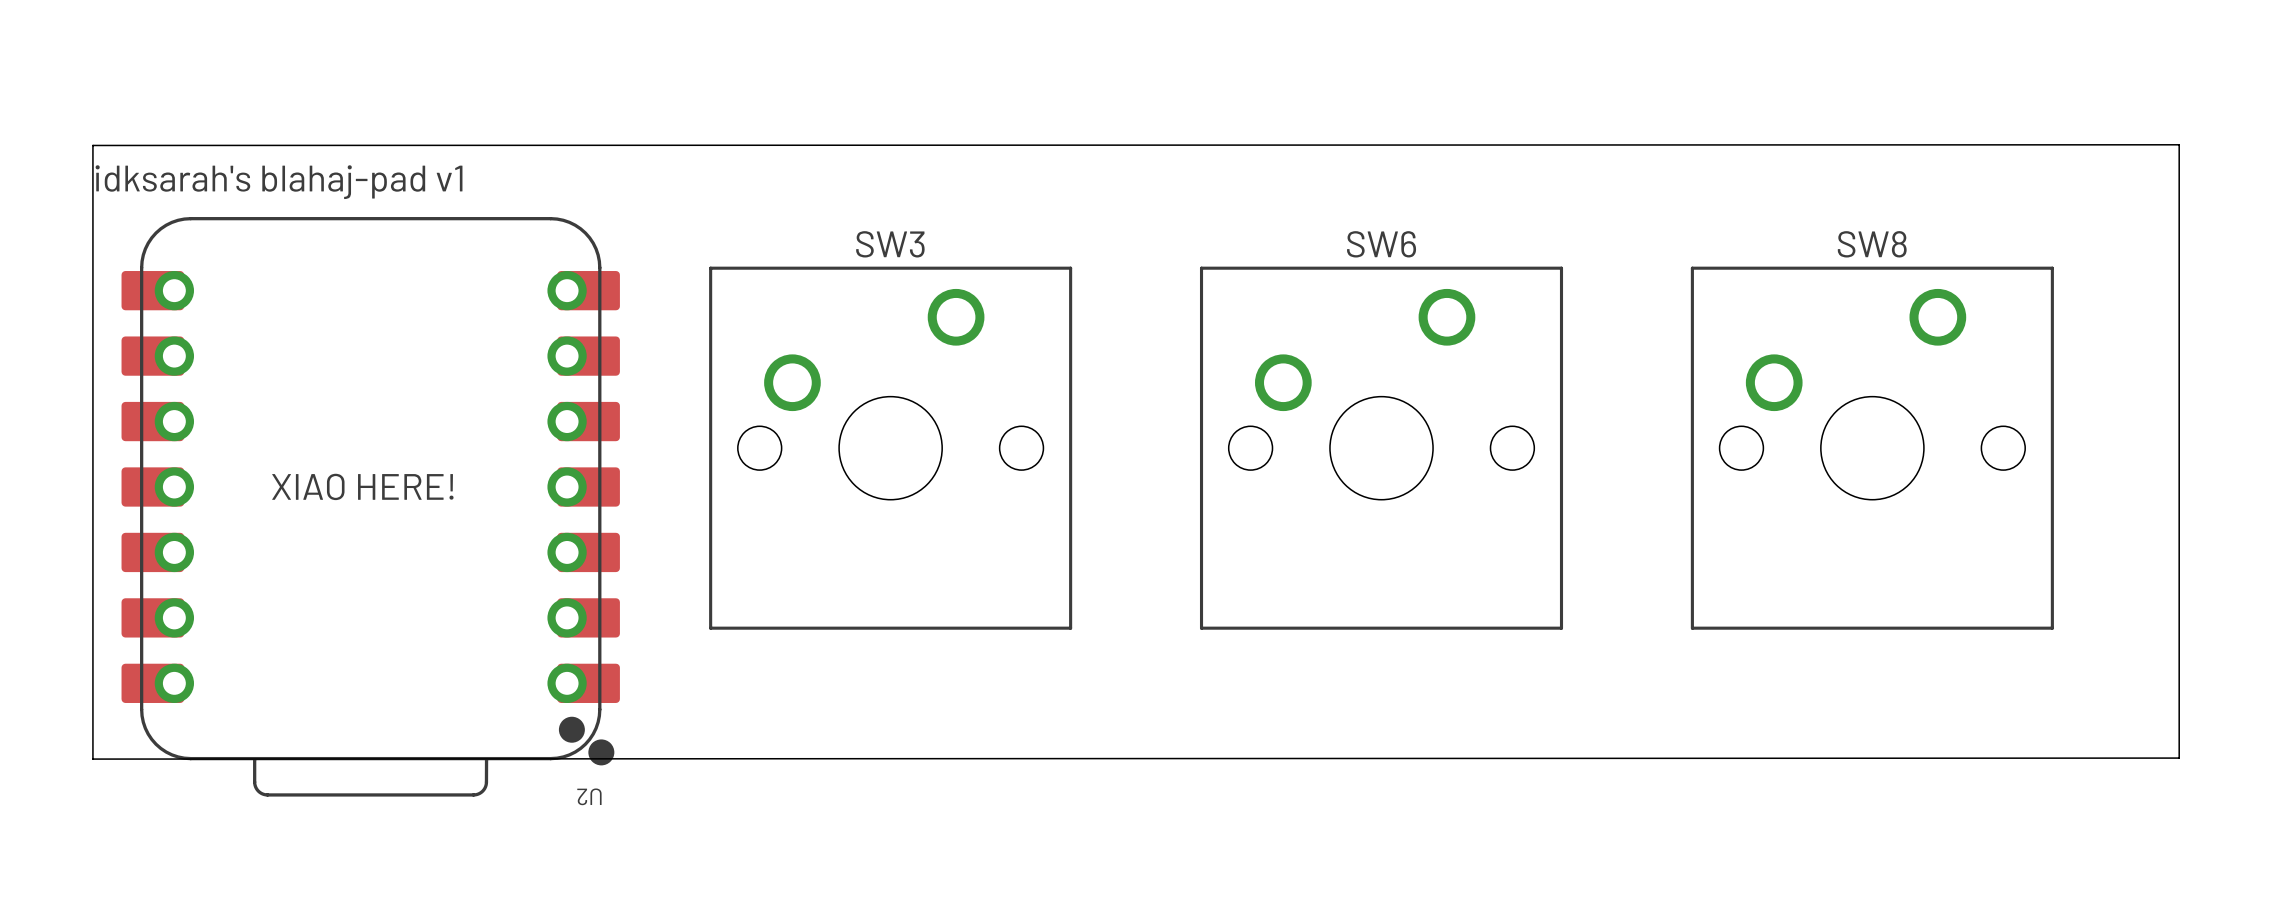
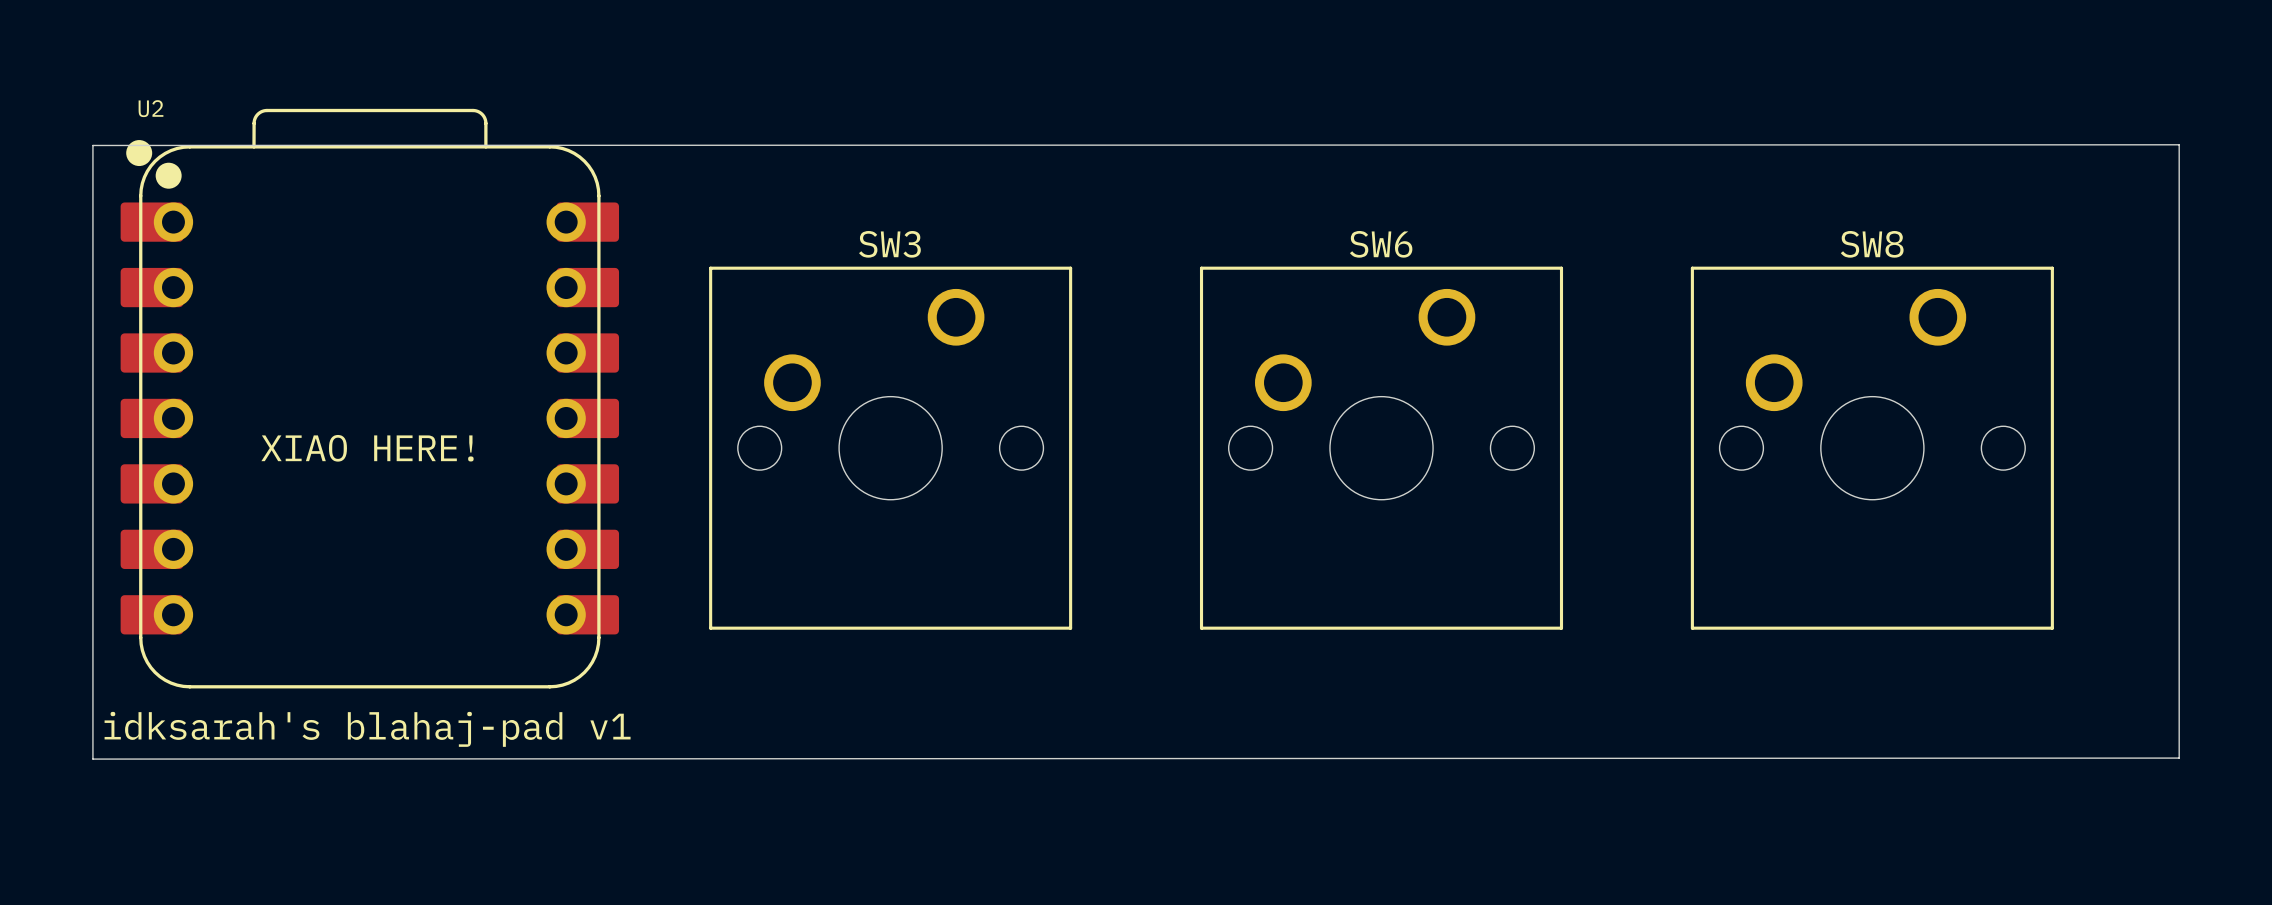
text position: idksarah's blahaj-pad v1 (279, 182) -> idksarah's blahaj-pad v1 (367, 729)
text position: XIAO HERE! (362, 486) -> XIAO HERE! (367, 448)
U2 rotation: 0° (370, 506) -> 180° (369, 398)

